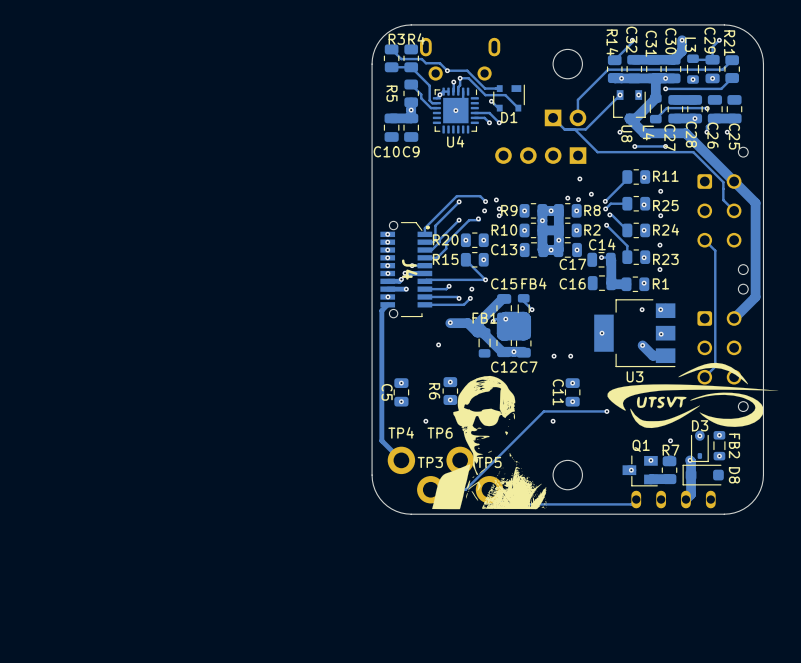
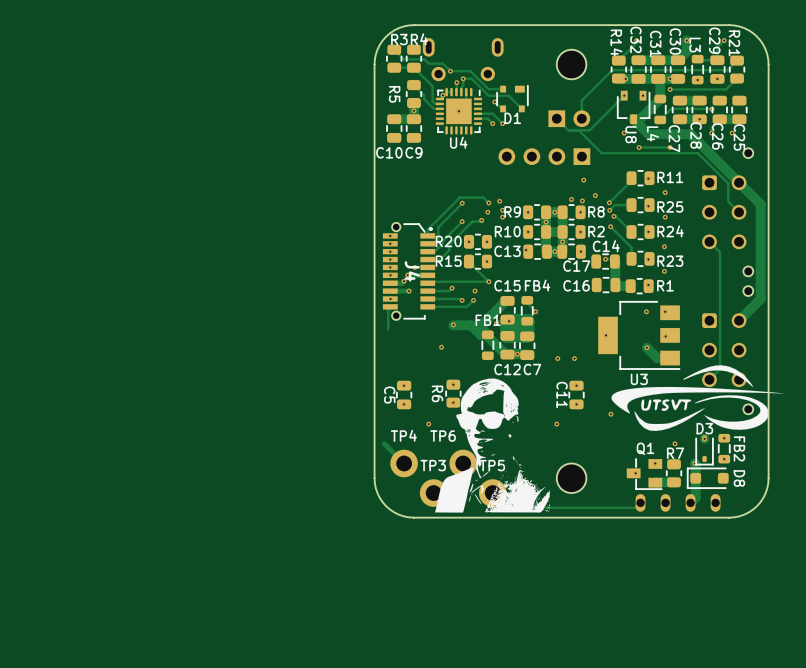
track: (385, 306) (381, 310) (381, 440) -> (388, 308) (388, 329)
track: (606, 411) (543, 411) (465, 489) (430, 489) -> none

